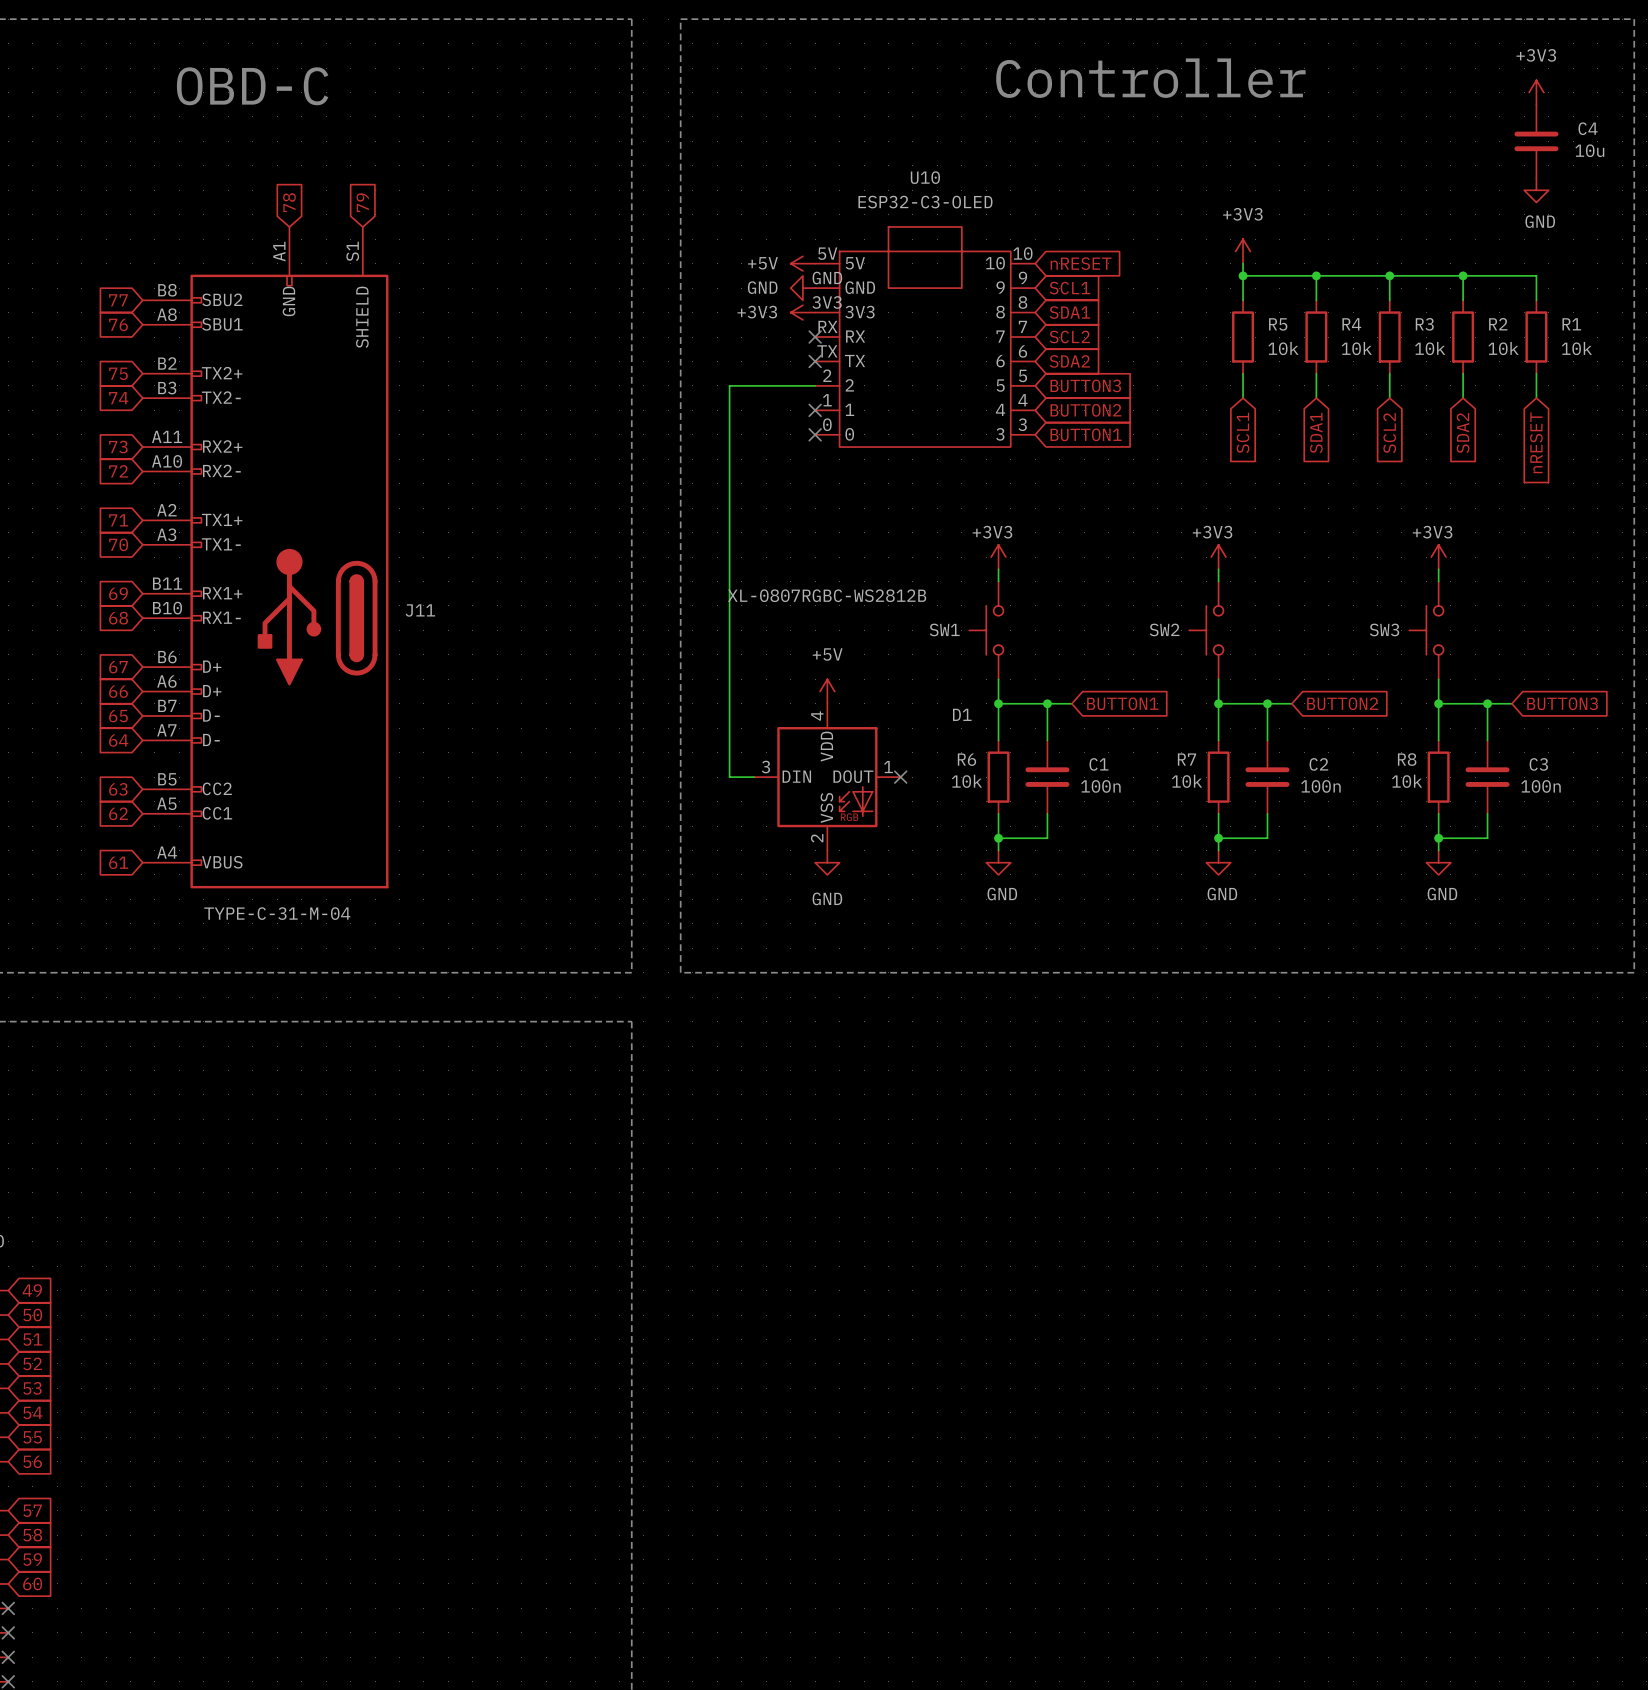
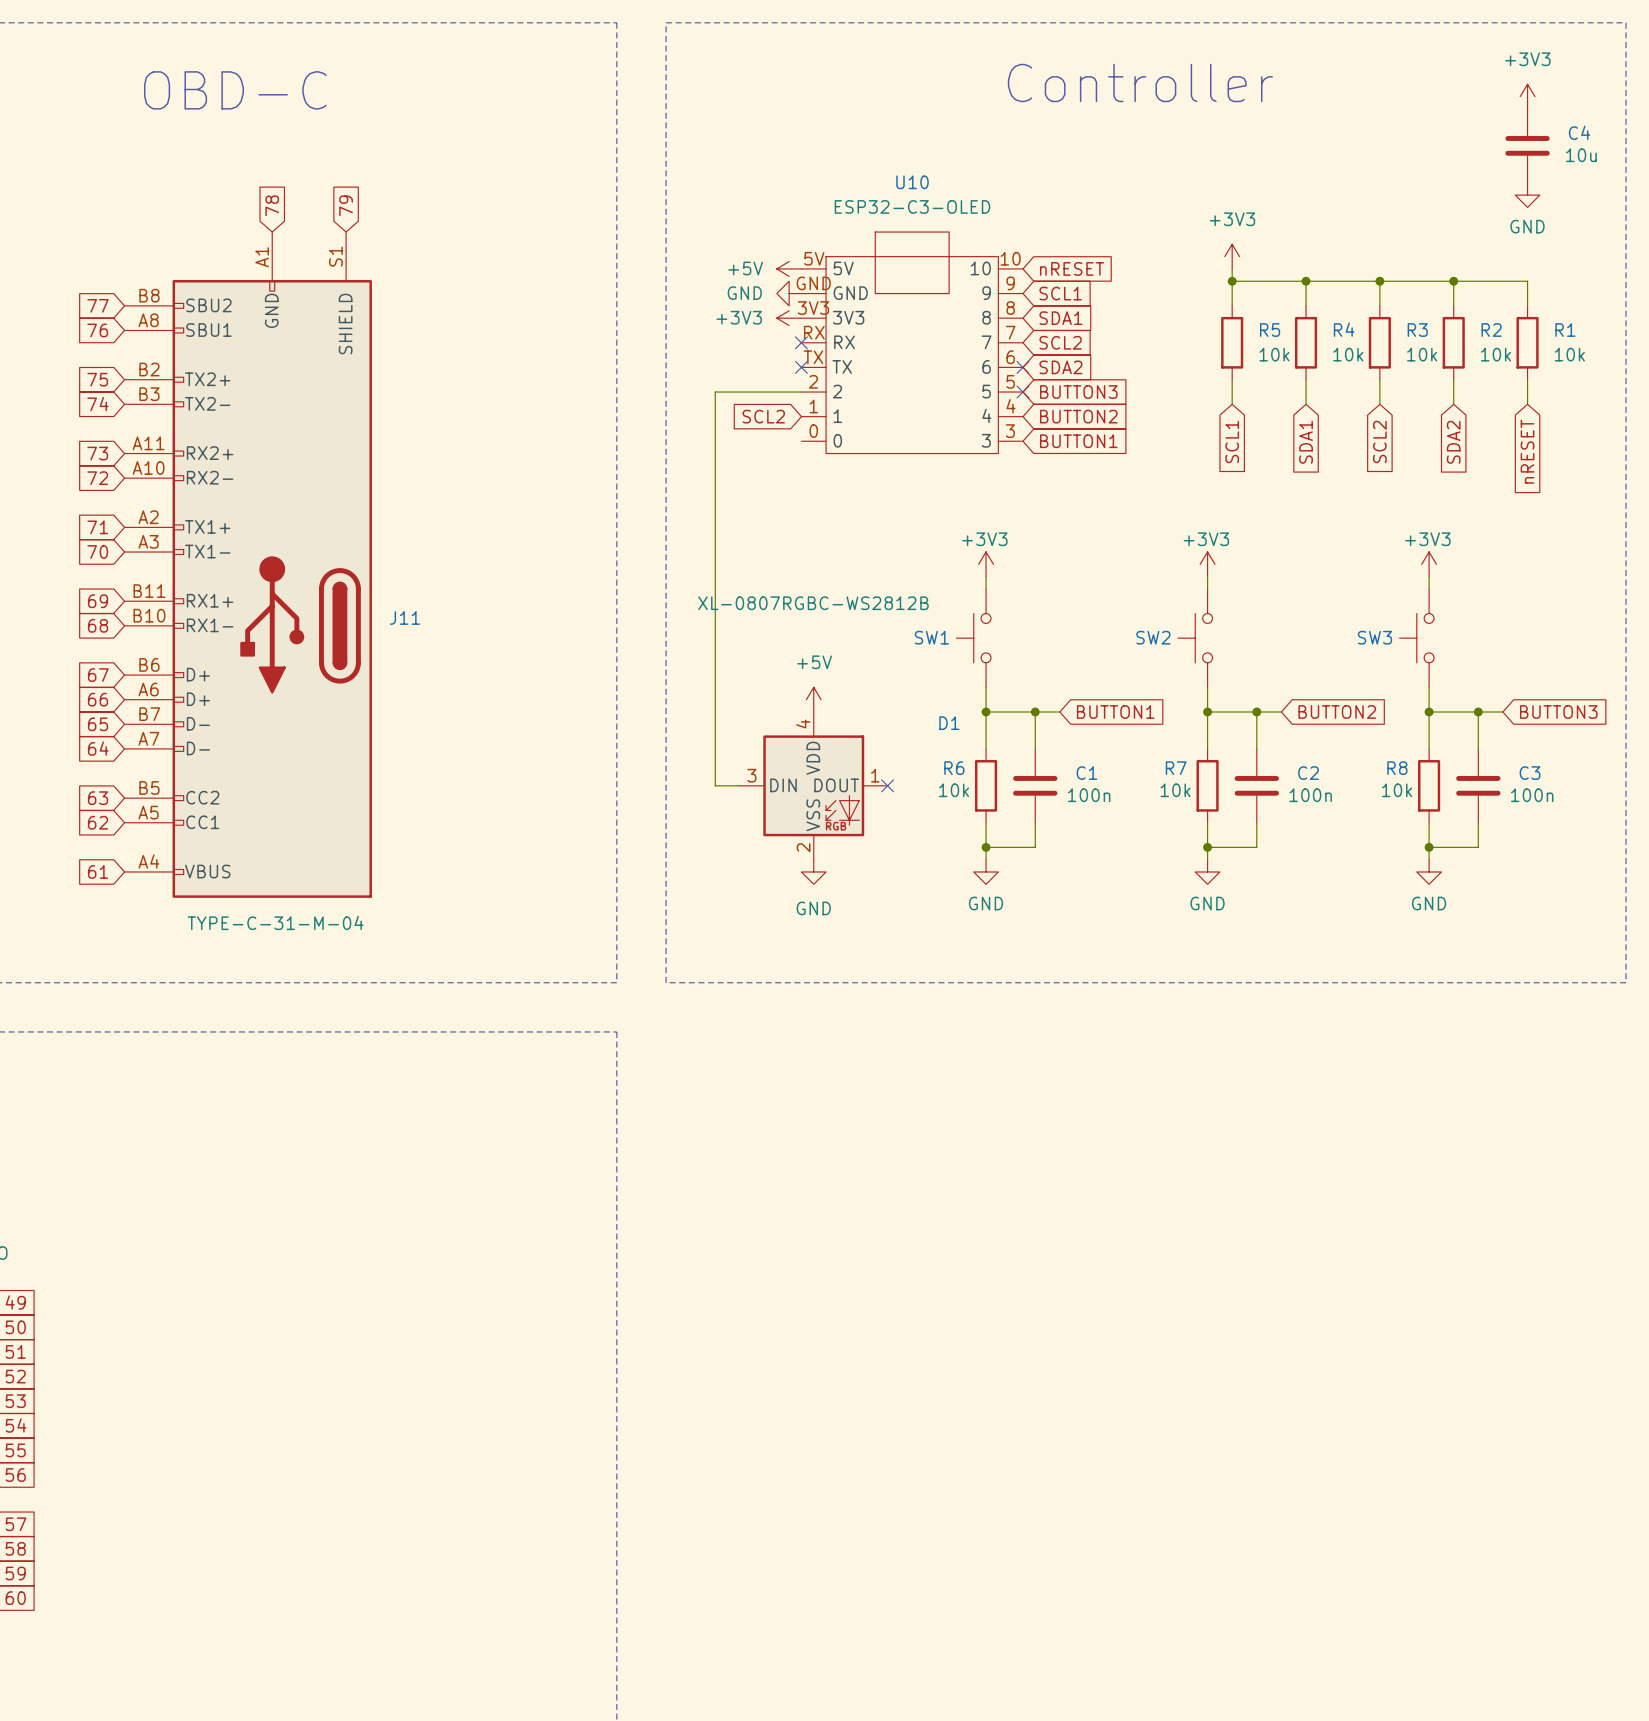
no-connect mark: none -> (1022, 367)
no-connect mark: none -> (1022, 392)
global label: none -> SCL2 (763, 416)
no-connect mark: (815, 410) -> none
no-connect mark: (815, 434) -> none

